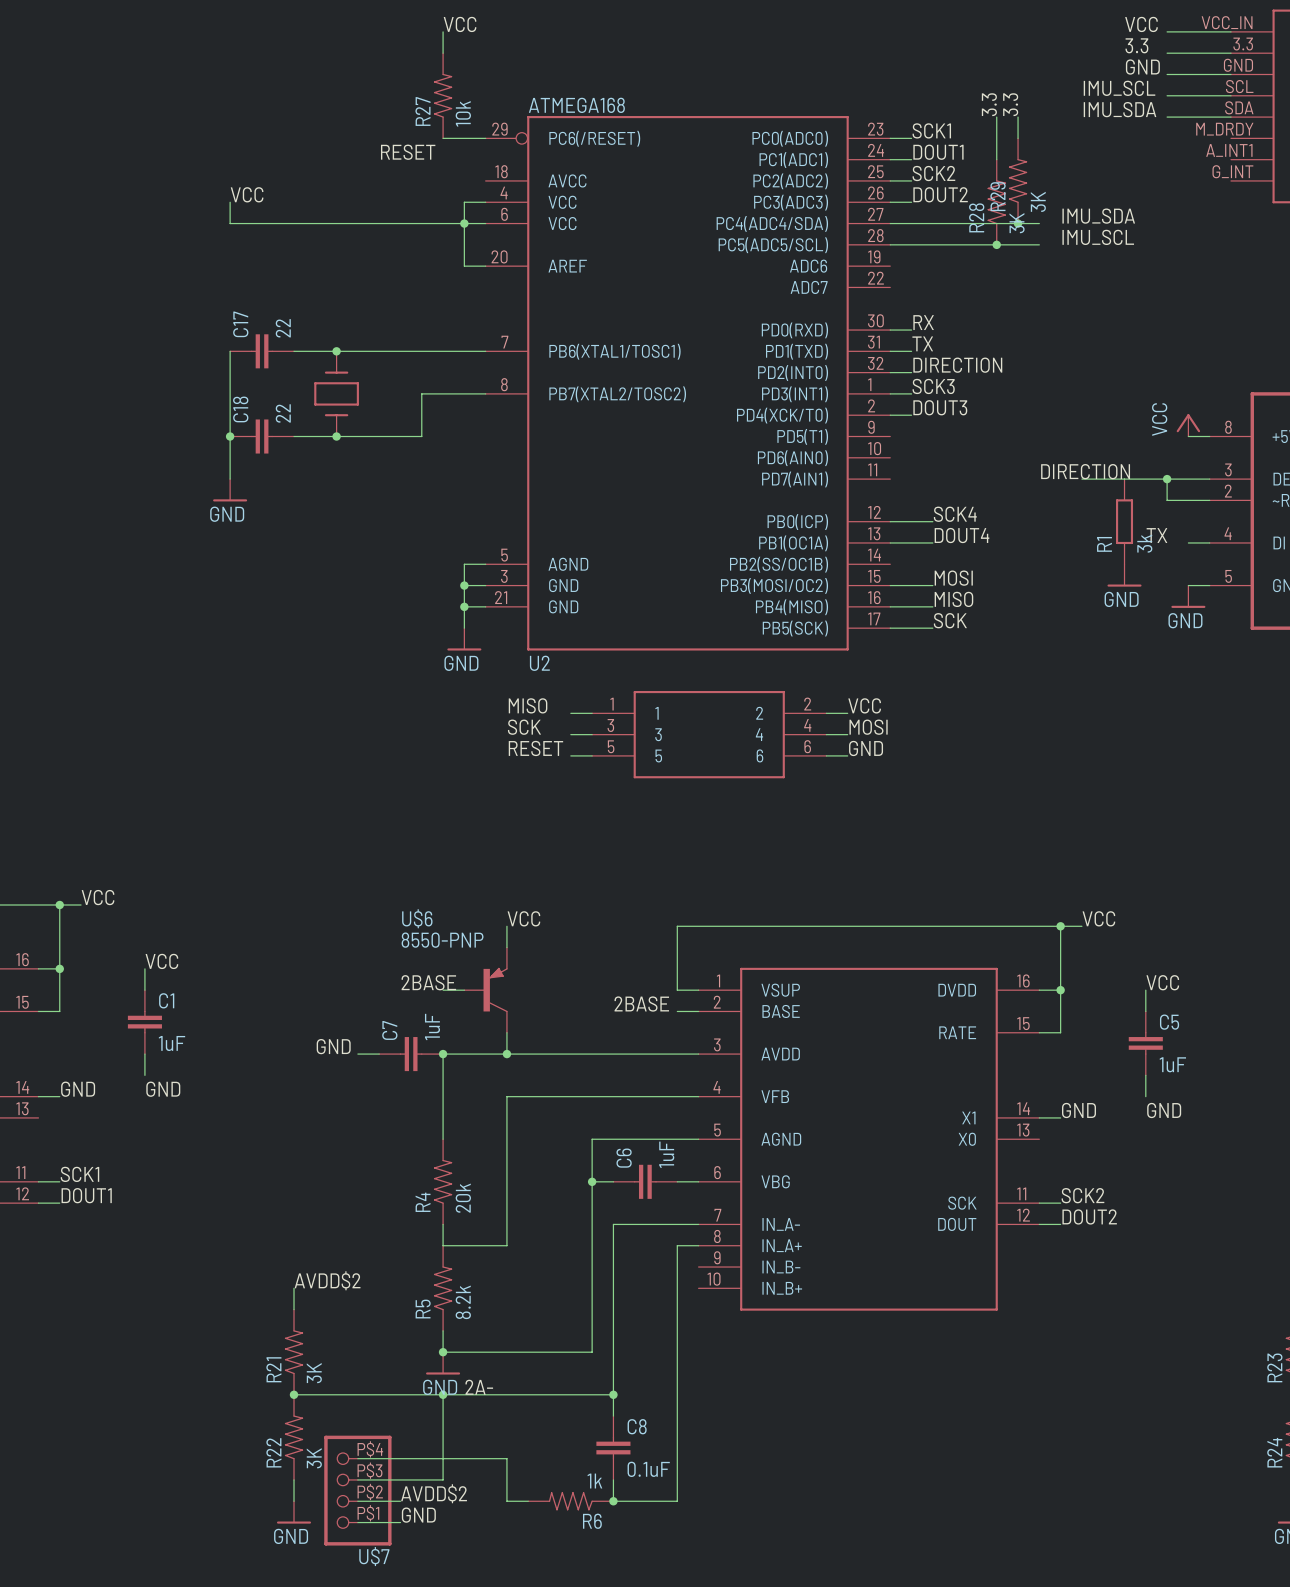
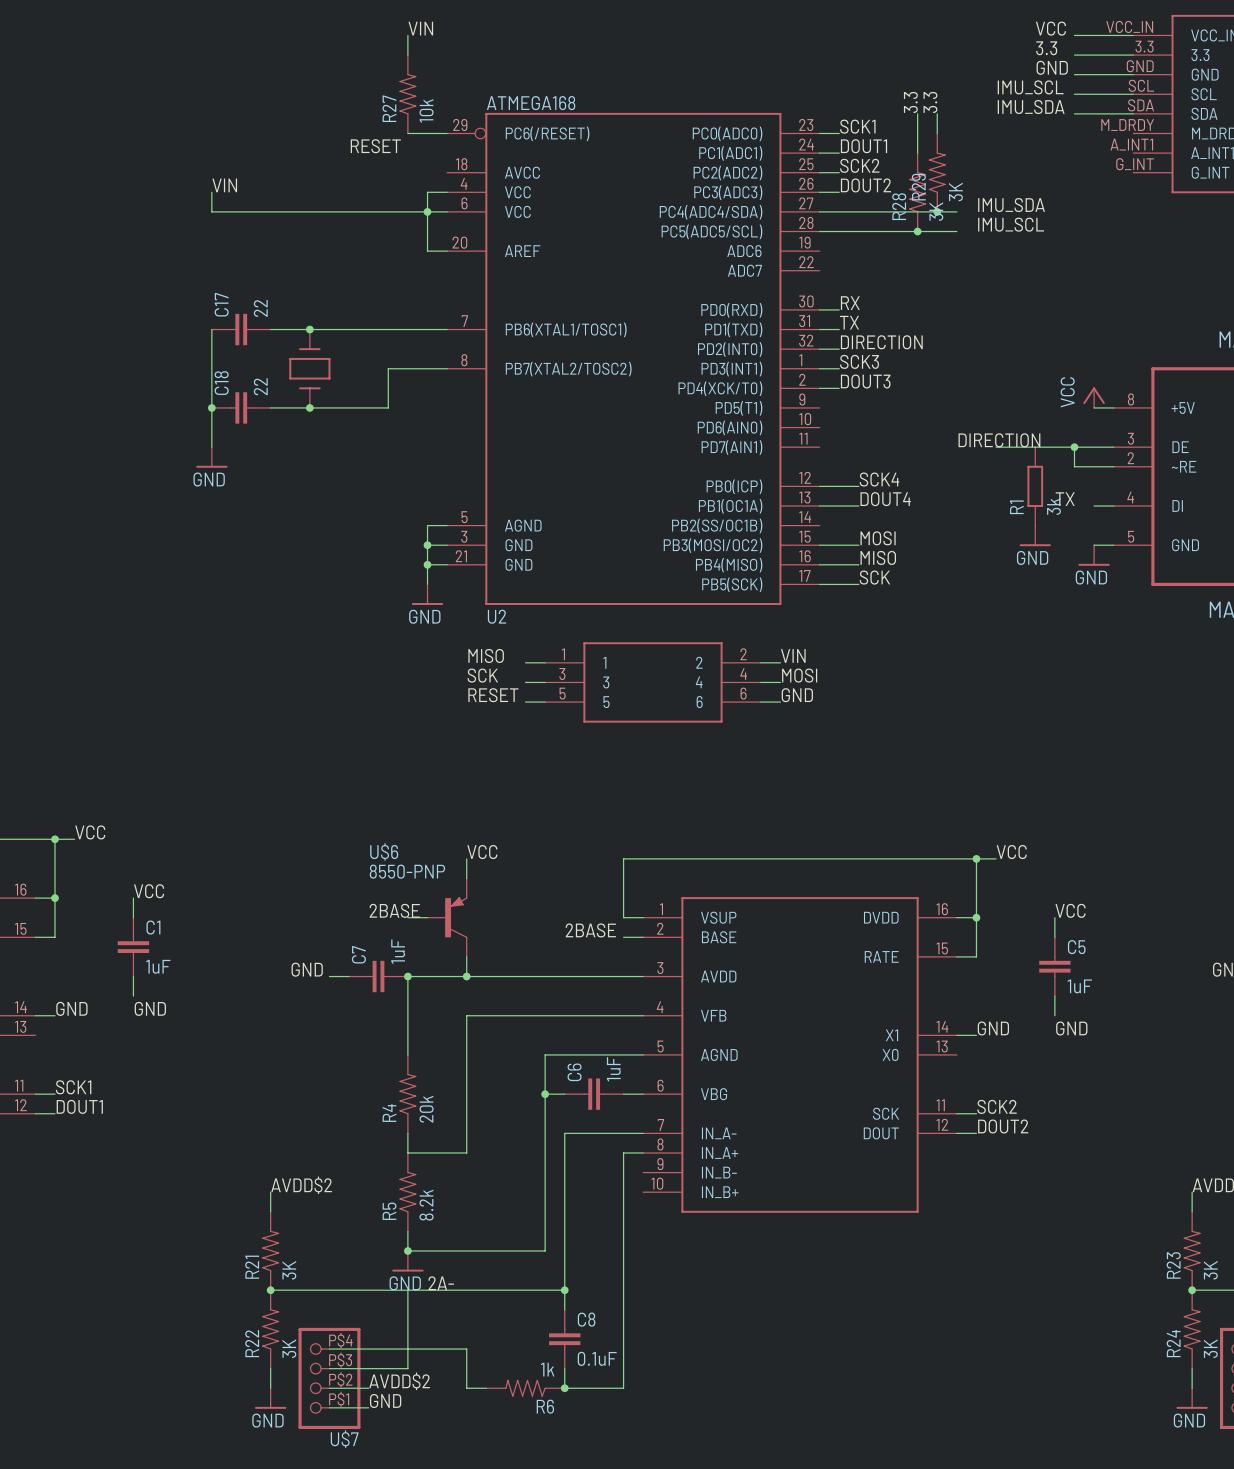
label: VCC (460, 24) -> VIN (420, 28)
label: VCC (247, 194) -> VIN (224, 185)
label: VCC (864, 705) -> VIN (793, 655)
junction: (443, 1394) -> none

